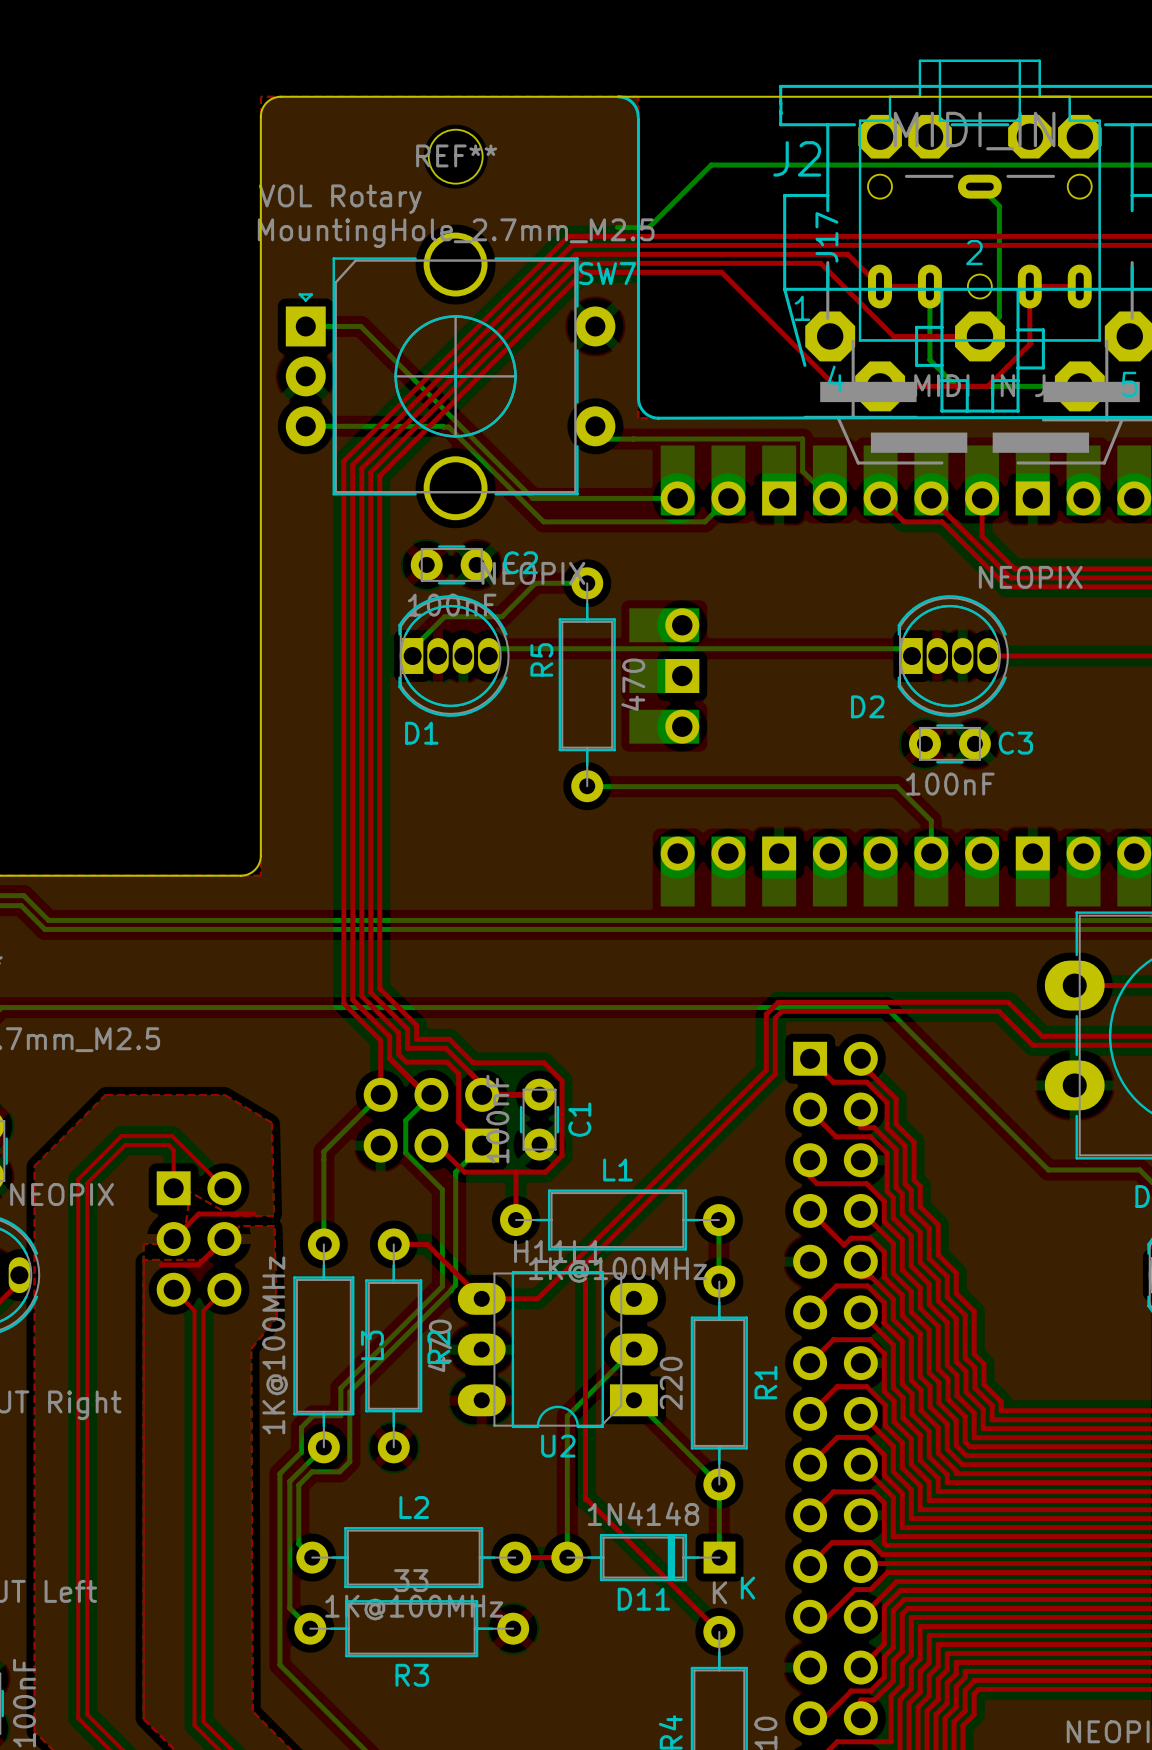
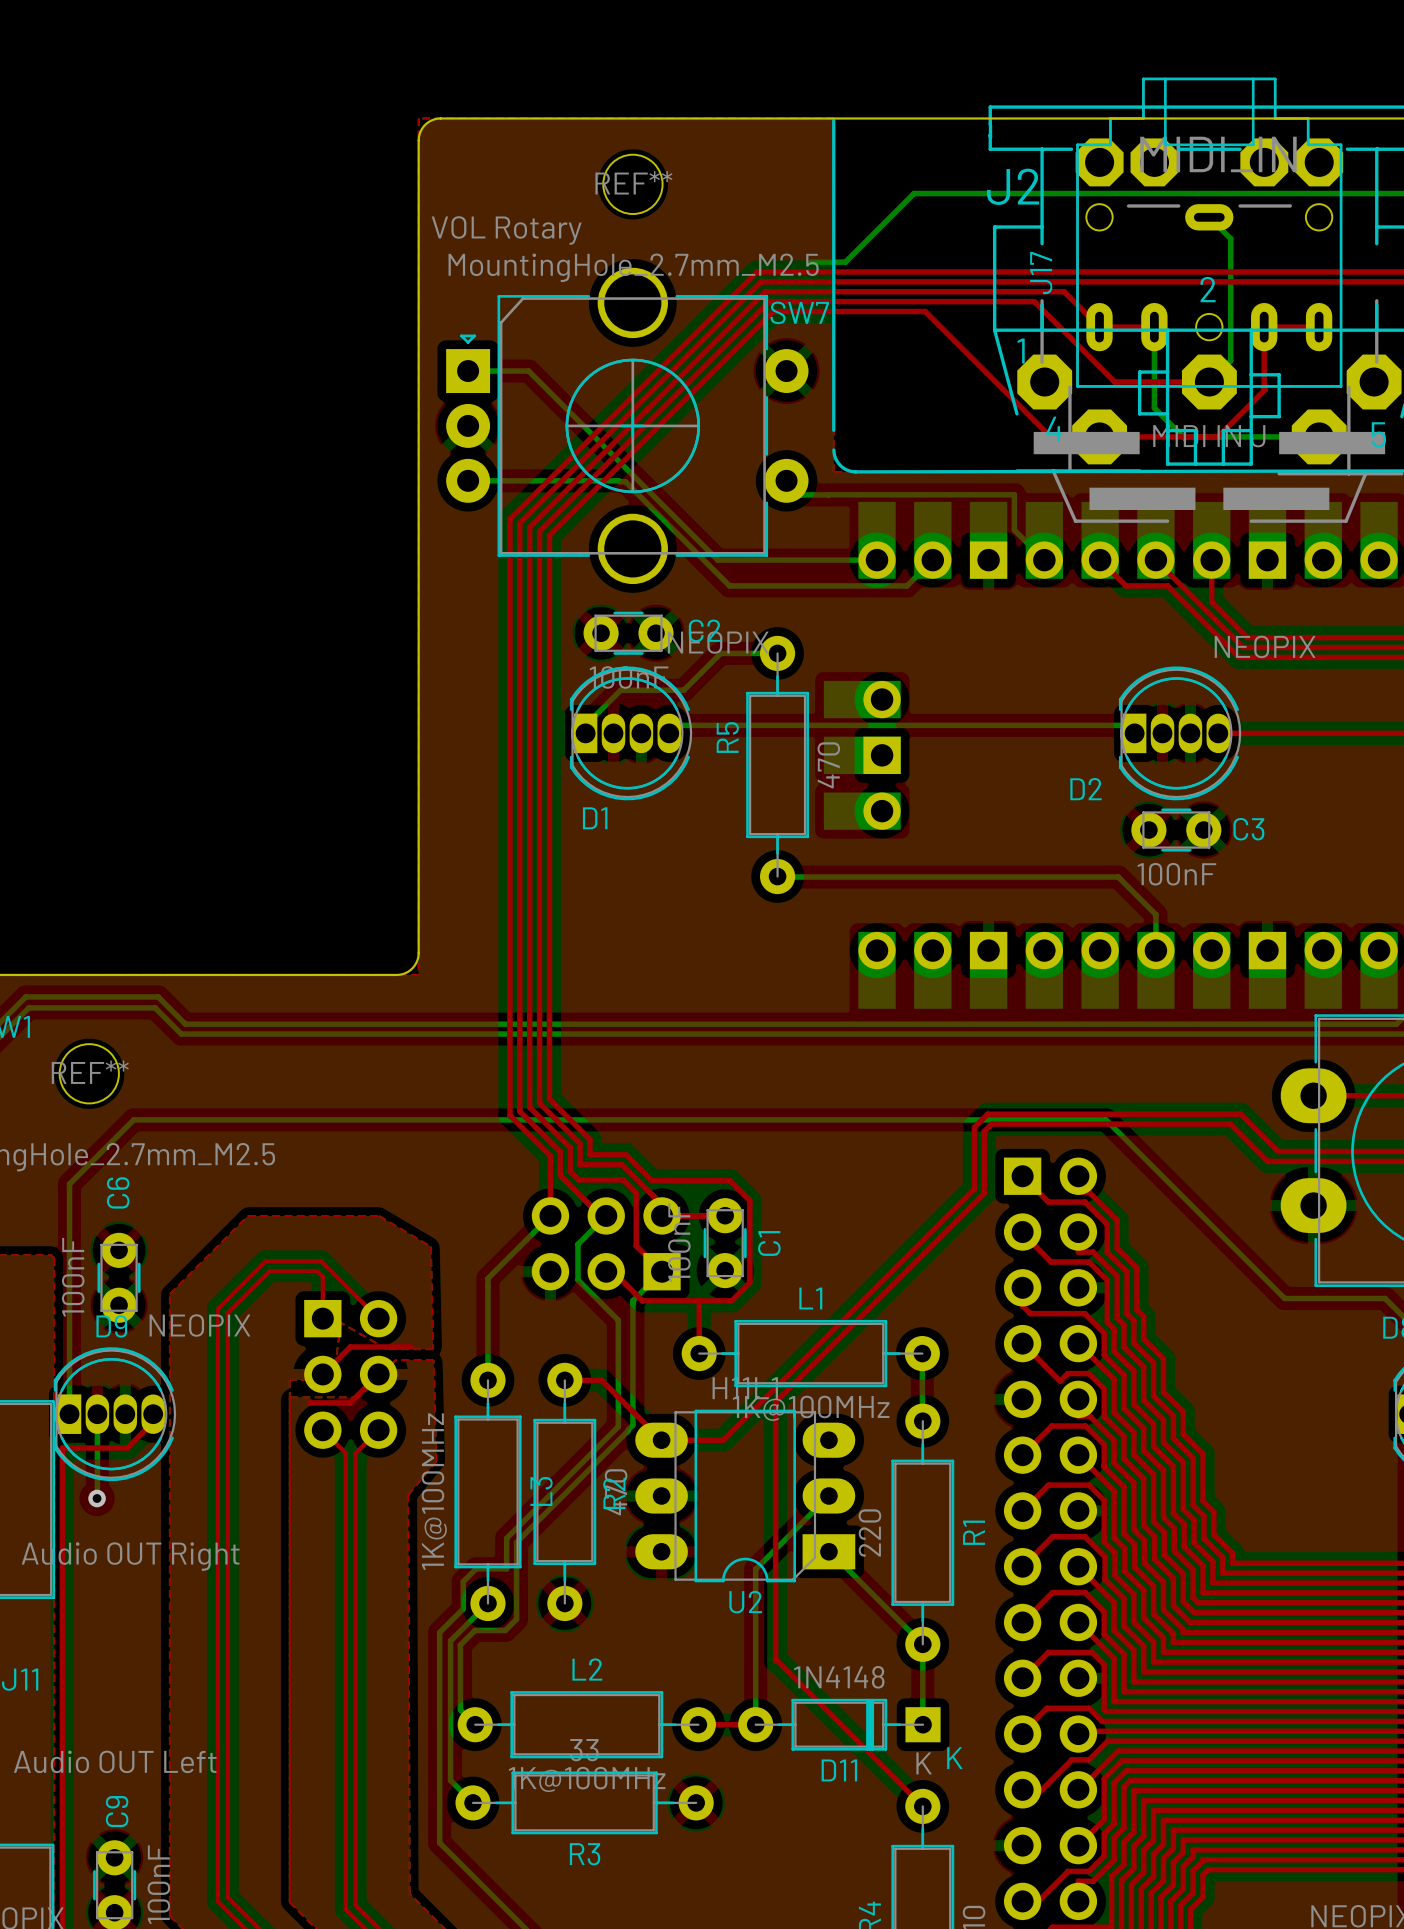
line: (618, 96) (632, 102) (638, 116) -> none
line: none -> (833, 120) (833, 430)
line: (638, 118) (638, 398) -> none

